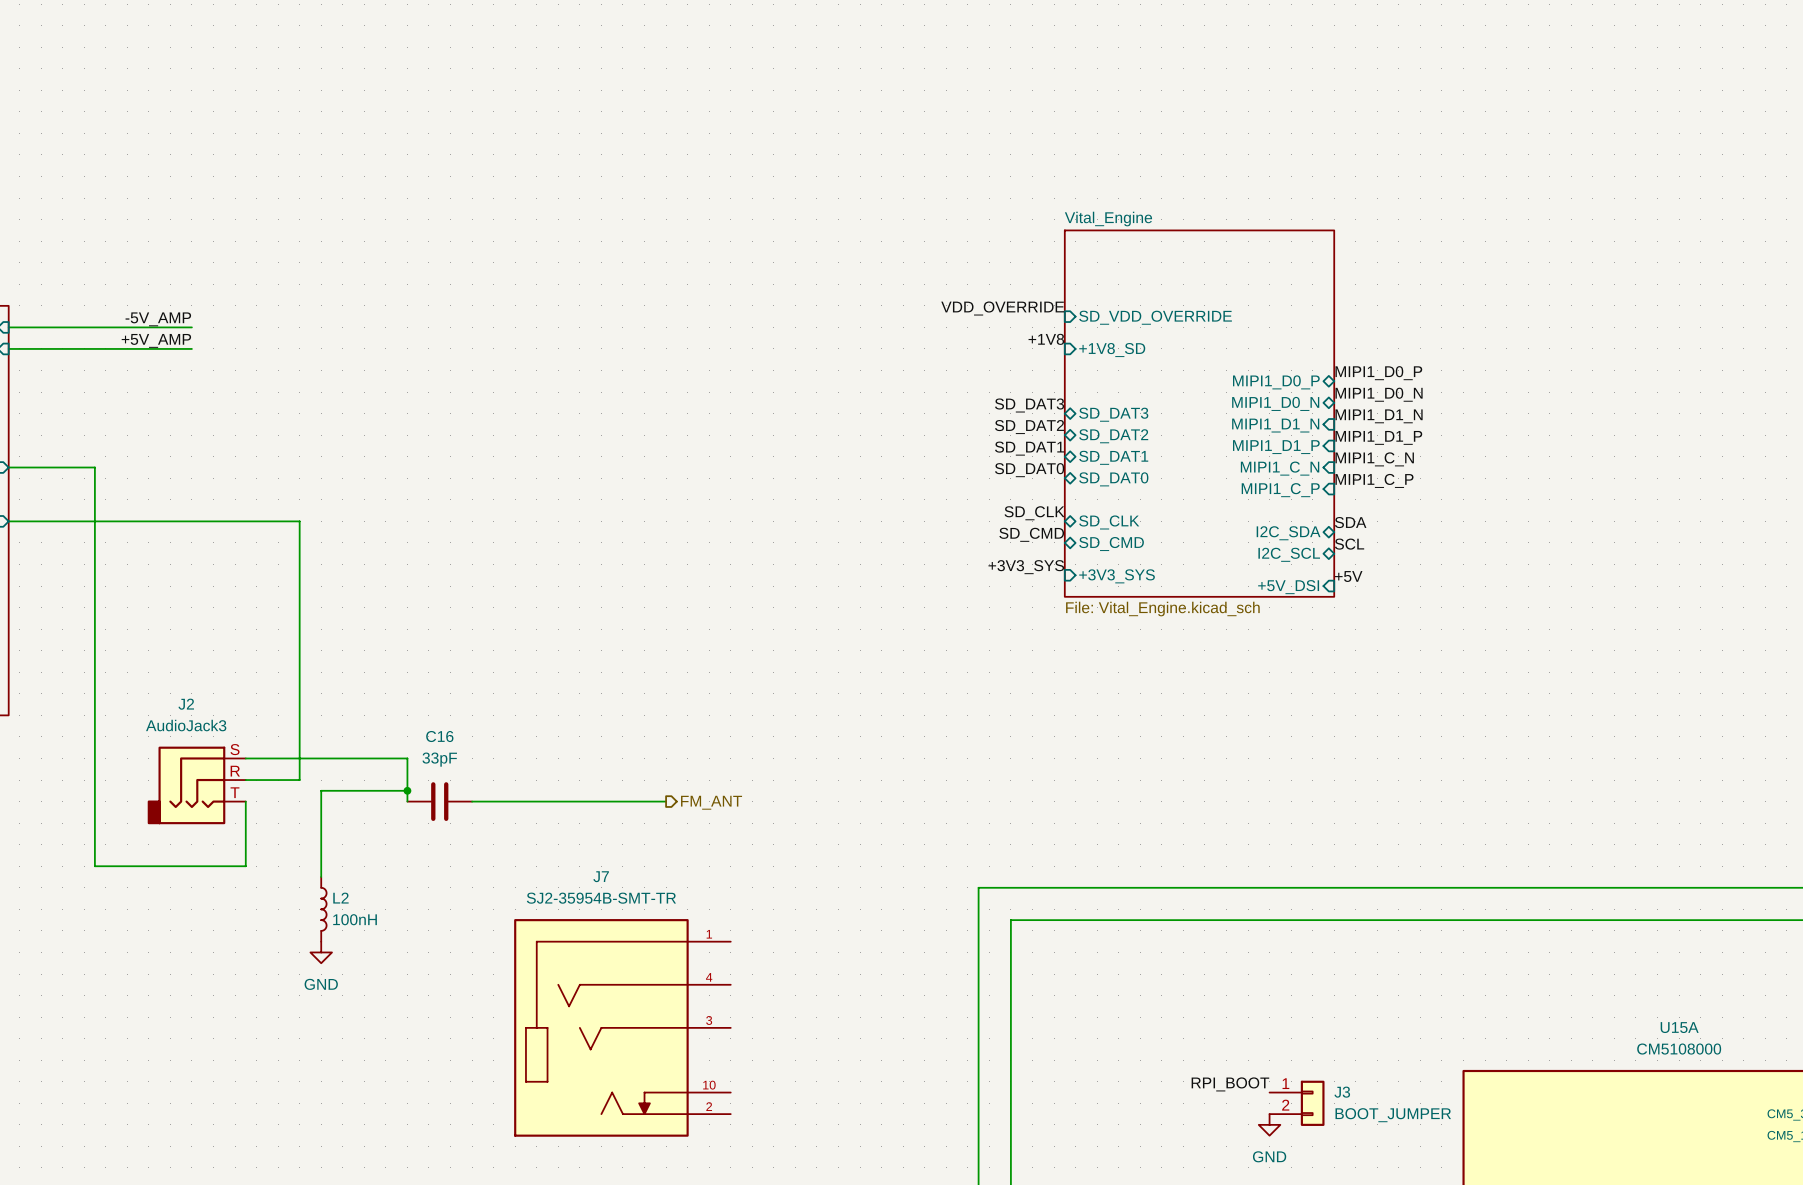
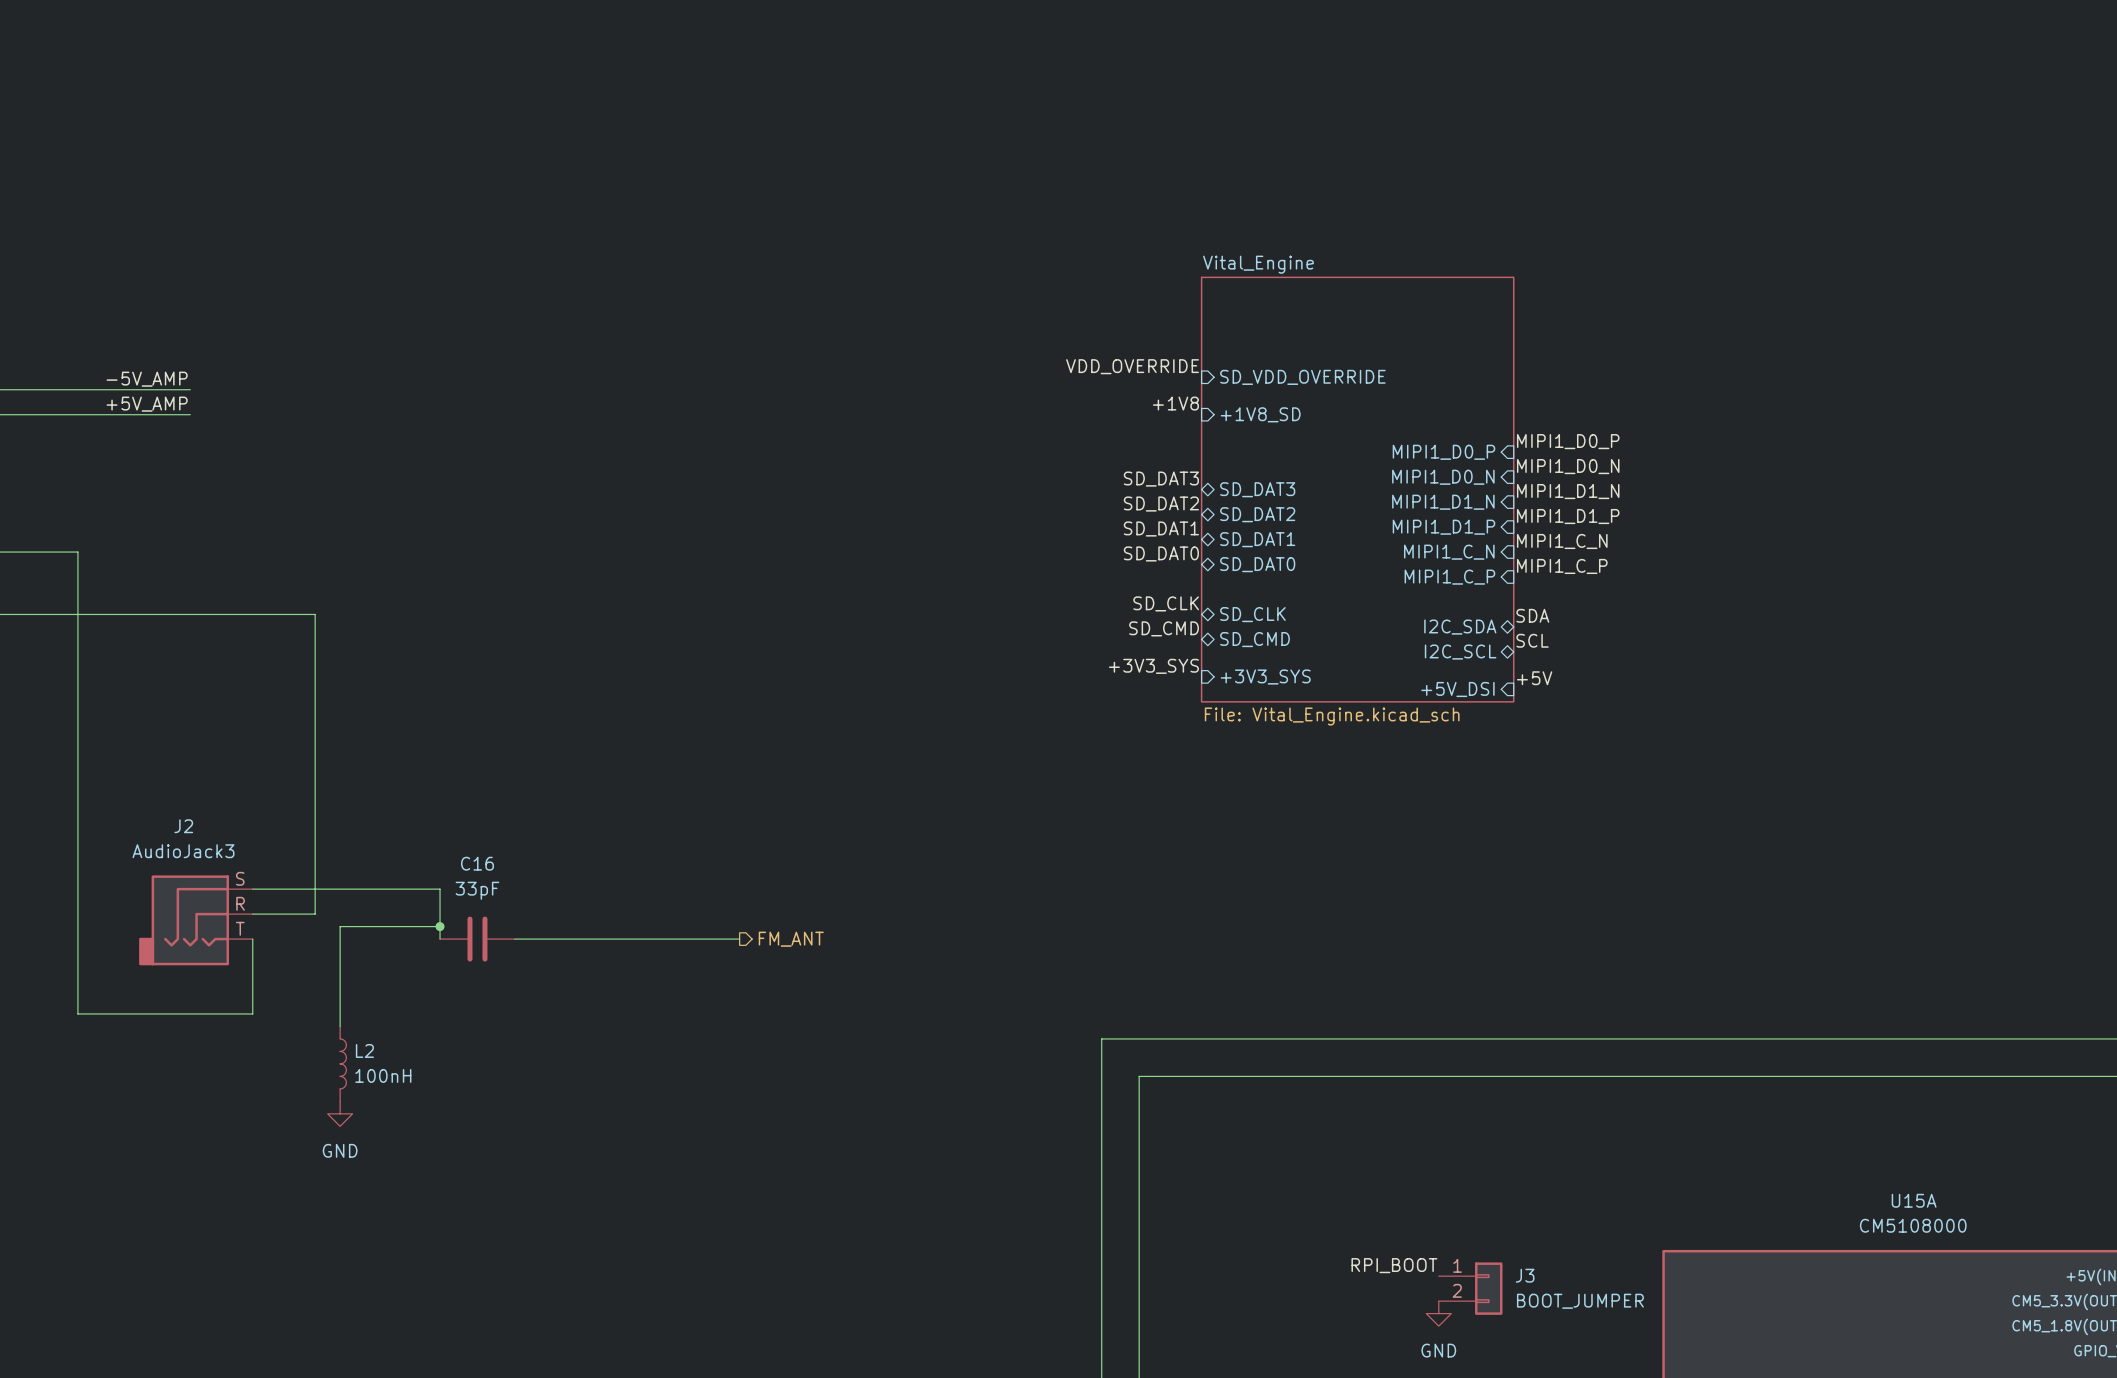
sheet pin shape: bidirectional (1276, 382) -> input (1443, 452)
sheet pin shape: bidirectional (1275, 403) -> input (1443, 477)
J7: SJ2-35954B-SMT-TR (622, 1027) -> none

